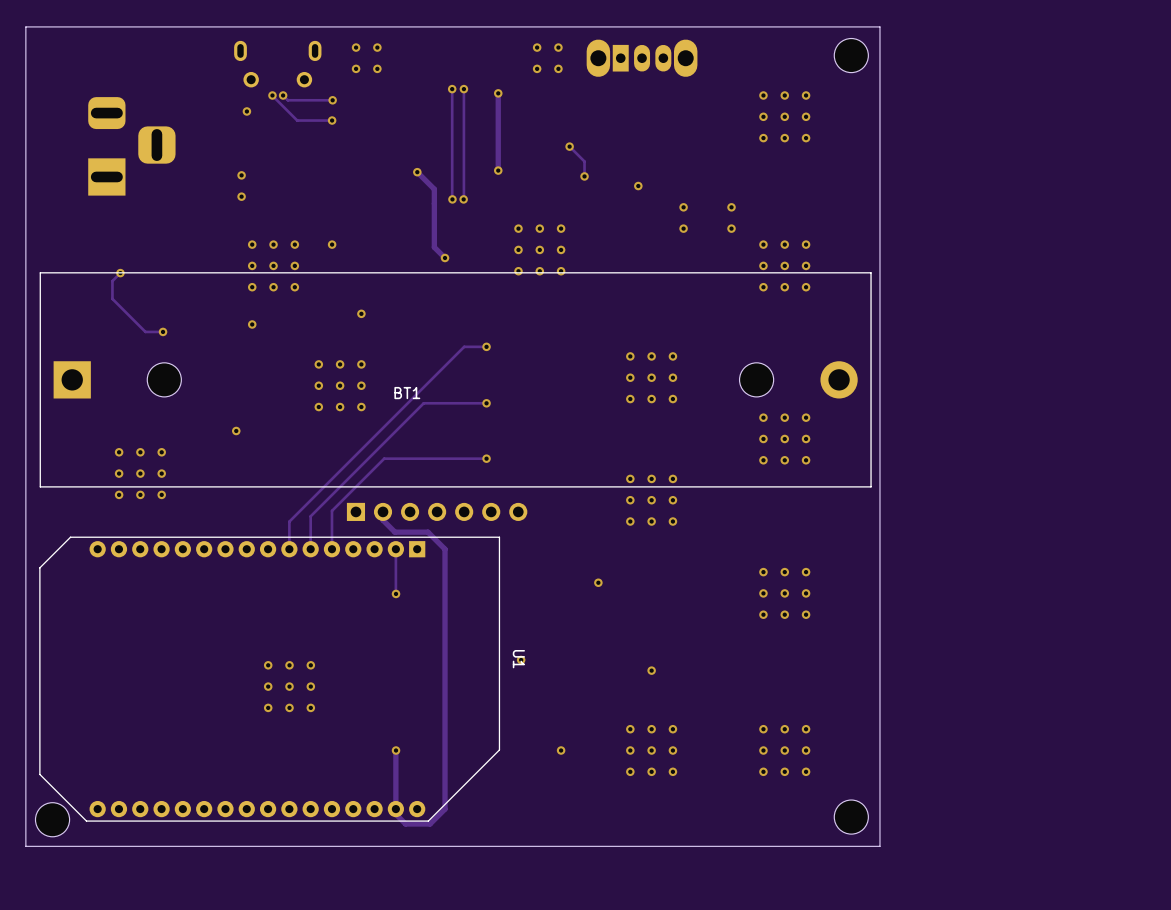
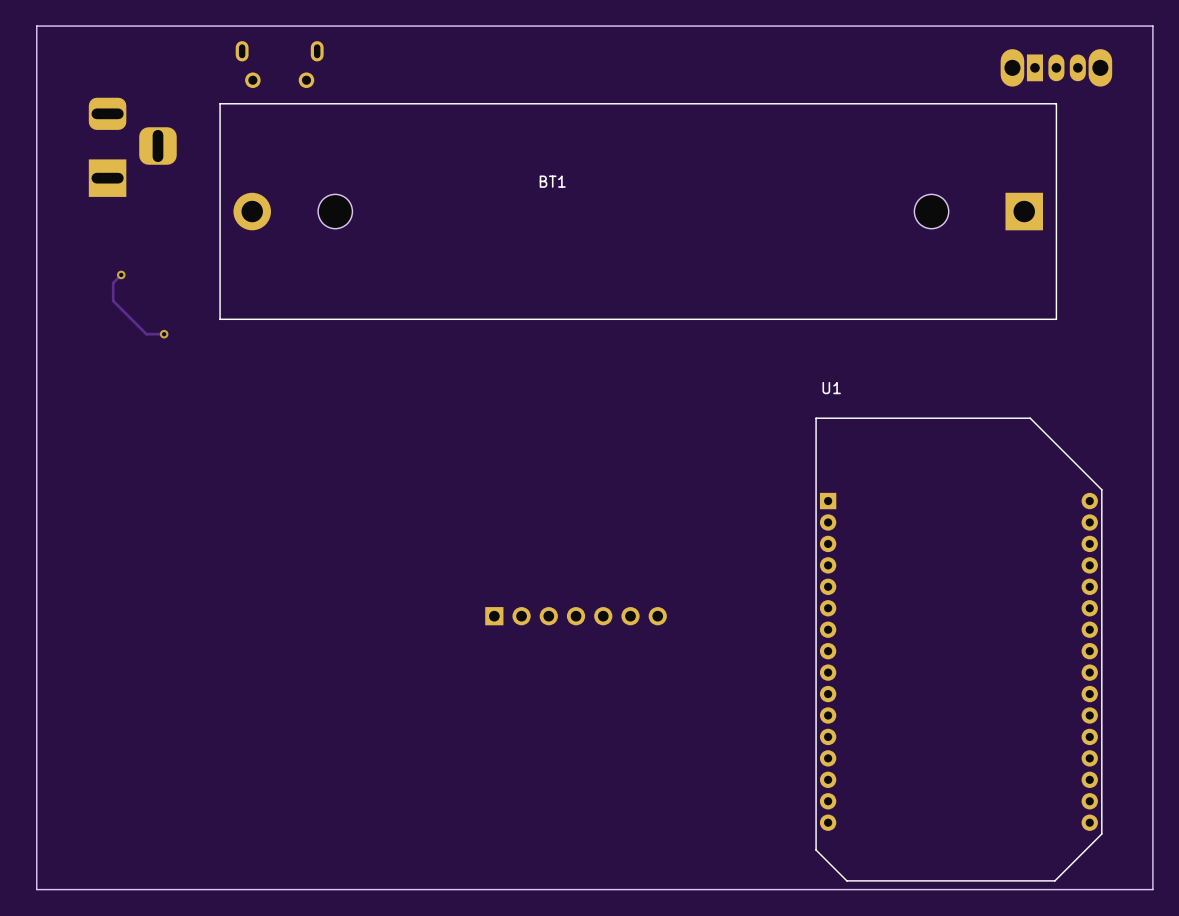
board edge: (879, 26) (25, 26) (25, 846) (879, 846) (879, 26) -> (1152, 26) (1152, 889) (36, 889) (36, 26) (1152, 26)
via: (356, 47) -> none
via: (377, 47) -> none
via: (537, 47) -> none
via: (558, 47) -> none
part: (851, 55) -> none
part: (642, 58) -> none
part: none -> (1056, 67)
via: (356, 68) -> none
via: (377, 68) -> none
via: (537, 68) -> none
via: (558, 68) -> none
track: (452, 89) (452, 199) -> none
via: (452, 89) -> none
track: (463, 89) (463, 199) -> none
via: (463, 89) -> none
track: (498, 93) (498, 170) -> none
via: (498, 93) -> none
track: (272, 95) (297, 120) (332, 120) -> none
via: (272, 95) -> none
track: (283, 95) (287, 100) (332, 100) -> none
via: (283, 95) -> none
via: (763, 95) -> none
via: (784, 95) -> none
via: (806, 95) -> none
via: (332, 100) -> none
via: (246, 111) -> none
via: (763, 116) -> none
via: (784, 116) -> none
via: (806, 116) -> none
via: (332, 120) -> none
via: (763, 138) -> none
via: (784, 138) -> none
via: (806, 138) -> none
track: (569, 146) (584, 161) (584, 176) -> none
via: (569, 146) -> none
via: (498, 170) -> none
track: (417, 172) (434, 189) (434, 247) (445, 257) -> none
via: (417, 172) -> none
via: (241, 175) -> none
via: (584, 176) -> none
via: (638, 186) -> none
via: (241, 196) -> none
via: (452, 199) -> none
via: (463, 199) -> none
via: (683, 207) -> none
via: (731, 207) -> none
via: (518, 228) -> none
via: (539, 228) -> none
via: (561, 228) -> none
via: (683, 228) -> none
via: (731, 228) -> none
via: (252, 244) -> none
via: (273, 244) -> none
via: (294, 244) -> none
via: (332, 244) -> none
via: (763, 244) -> none
via: (784, 244) -> none
via: (806, 244) -> none
via: (518, 249) -> none
via: (539, 249) -> none
via: (561, 249) -> none
via: (445, 257) -> none
via: (252, 265) -> none
via: (273, 265) -> none
via: (294, 265) -> none
via: (763, 265) -> none
via: (784, 265) -> none
via: (806, 265) -> none
via: (518, 271) -> none
via: (539, 271) -> none
via: (561, 271) -> none
via: (252, 287) -> none
via: (273, 287) -> none
via: (294, 287) -> none
via: (763, 287) -> none
via: (784, 287) -> none
via: (806, 287) -> none
via: (361, 313) -> none
via: (252, 324) -> none
track: (486, 346) (464, 346) (289, 521) (289, 549) -> none
via: (486, 346) -> none
via: (630, 356) -> none
via: (651, 356) -> none
via: (672, 356) -> none
via: (318, 364) -> none
via: (340, 364) -> none
via: (361, 364) -> none
via: (630, 377) -> none
via: (651, 377) -> none
via: (672, 377) -> none
BT1 rotation: 0° (455, 379) -> 180° (638, 211)
via: (318, 385) -> none
via: (340, 385) -> none
via: (361, 385) -> none
BT1 name position: BT1 (407, 393) -> BT1 (552, 181)
via: (630, 399) -> none
via: (651, 399) -> none
via: (672, 399) -> none
track: (486, 403) (423, 403) (310, 516) (310, 549) -> none
via: (486, 403) -> none
via: (318, 407) -> none
via: (340, 407) -> none
via: (361, 407) -> none
via: (763, 417) -> none
via: (784, 417) -> none
via: (806, 417) -> none
via: (236, 430) -> none
via: (763, 438) -> none
via: (784, 438) -> none
via: (806, 438) -> none
via: (119, 452) -> none
via: (140, 452) -> none
via: (161, 452) -> none
track: (486, 458) (384, 458) (331, 510) (331, 549) -> none
via: (486, 458) -> none
via: (763, 460) -> none
via: (784, 460) -> none
via: (806, 460) -> none
via: (119, 473) -> none
via: (140, 473) -> none
via: (161, 473) -> none
via: (630, 478) -> none
via: (651, 478) -> none
via: (672, 478) -> none
via: (119, 494) -> none
via: (140, 494) -> none
via: (161, 494) -> none
via: (630, 500) -> none
via: (651, 500) -> none
via: (672, 500) -> none
track: (383, 511) (383, 520) (394, 532) (427, 532) (445, 549) (445, 809) (430, 823) (405, 823) (395, 814) (395, 750) -> none
part position: (437, 511) -> (576, 616)
via: (630, 521) -> none
via: (651, 521) -> none
via: (672, 521) -> none
track: (395, 549) (395, 593) -> none
via: (763, 572) -> none
via: (784, 572) -> none
via: (806, 572) -> none
via: (598, 582) -> none
via: (396, 593) -> none
via: (763, 593) -> none
via: (784, 593) -> none
via: (806, 593) -> none
via: (763, 614) -> none
via: (784, 614) -> none
via: (806, 614) -> none
U1 name position: U1 (518, 659) -> U1 (831, 388)
via: (521, 659) -> none
via: (268, 665) -> none
via: (289, 665) -> none
via: (310, 665) -> none
via: (651, 670) -> none
U1 rotation: 0° (269, 679) -> 90° counterclockwise (958, 649)
U1 position: (269, 679) -> (958, 649)
via: (268, 686) -> none
via: (289, 686) -> none
via: (310, 686) -> none
via: (268, 707) -> none
via: (289, 707) -> none
via: (310, 707) -> none
via: (630, 729) -> none
via: (651, 729) -> none
via: (672, 729) -> none
via: (763, 729) -> none
via: (784, 729) -> none
via: (806, 729) -> none
via: (396, 750) -> none
via: (561, 750) -> none
via: (630, 750) -> none
via: (651, 750) -> none
via: (672, 750) -> none
via: (763, 750) -> none
via: (784, 750) -> none
via: (806, 750) -> none
via: (630, 771) -> none
via: (651, 771) -> none
via: (672, 771) -> none
via: (763, 771) -> none
via: (784, 771) -> none
via: (806, 771) -> none
part: (851, 817) -> none
part: (52, 819) -> none

